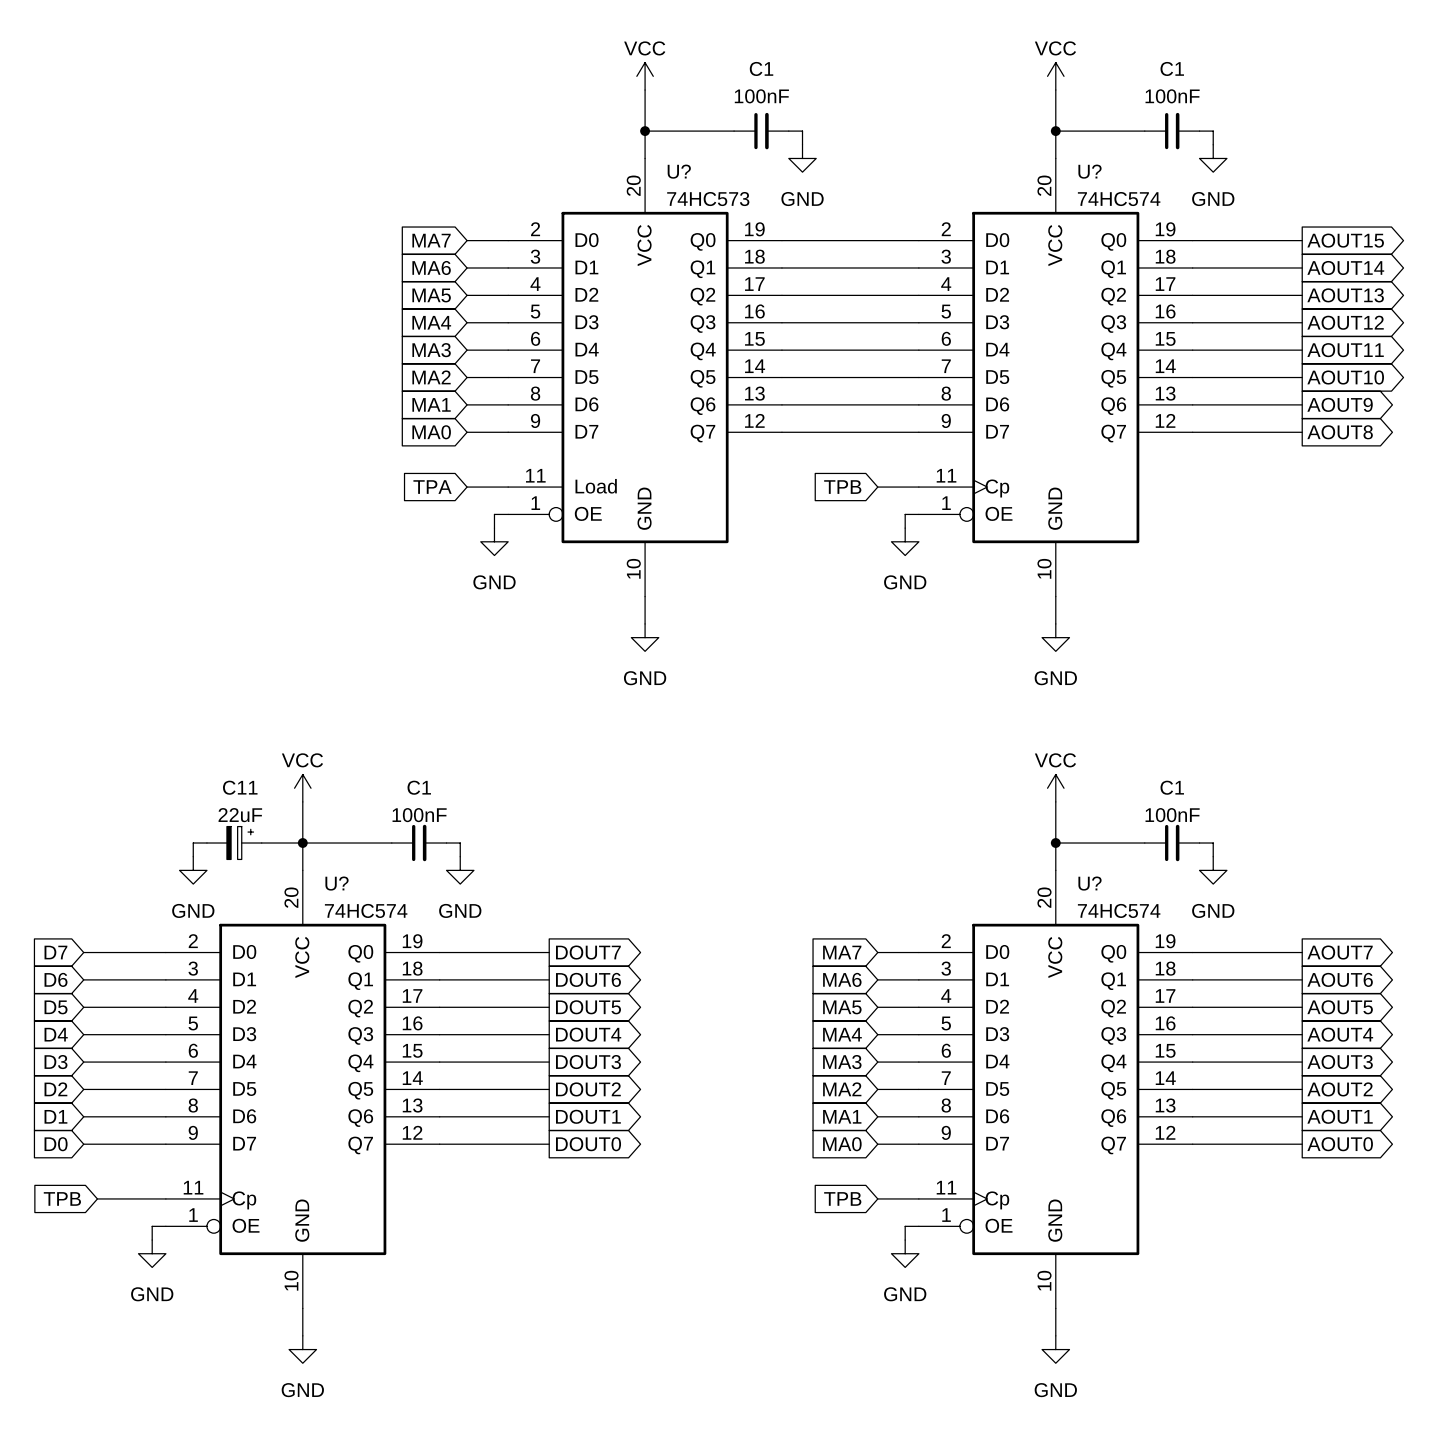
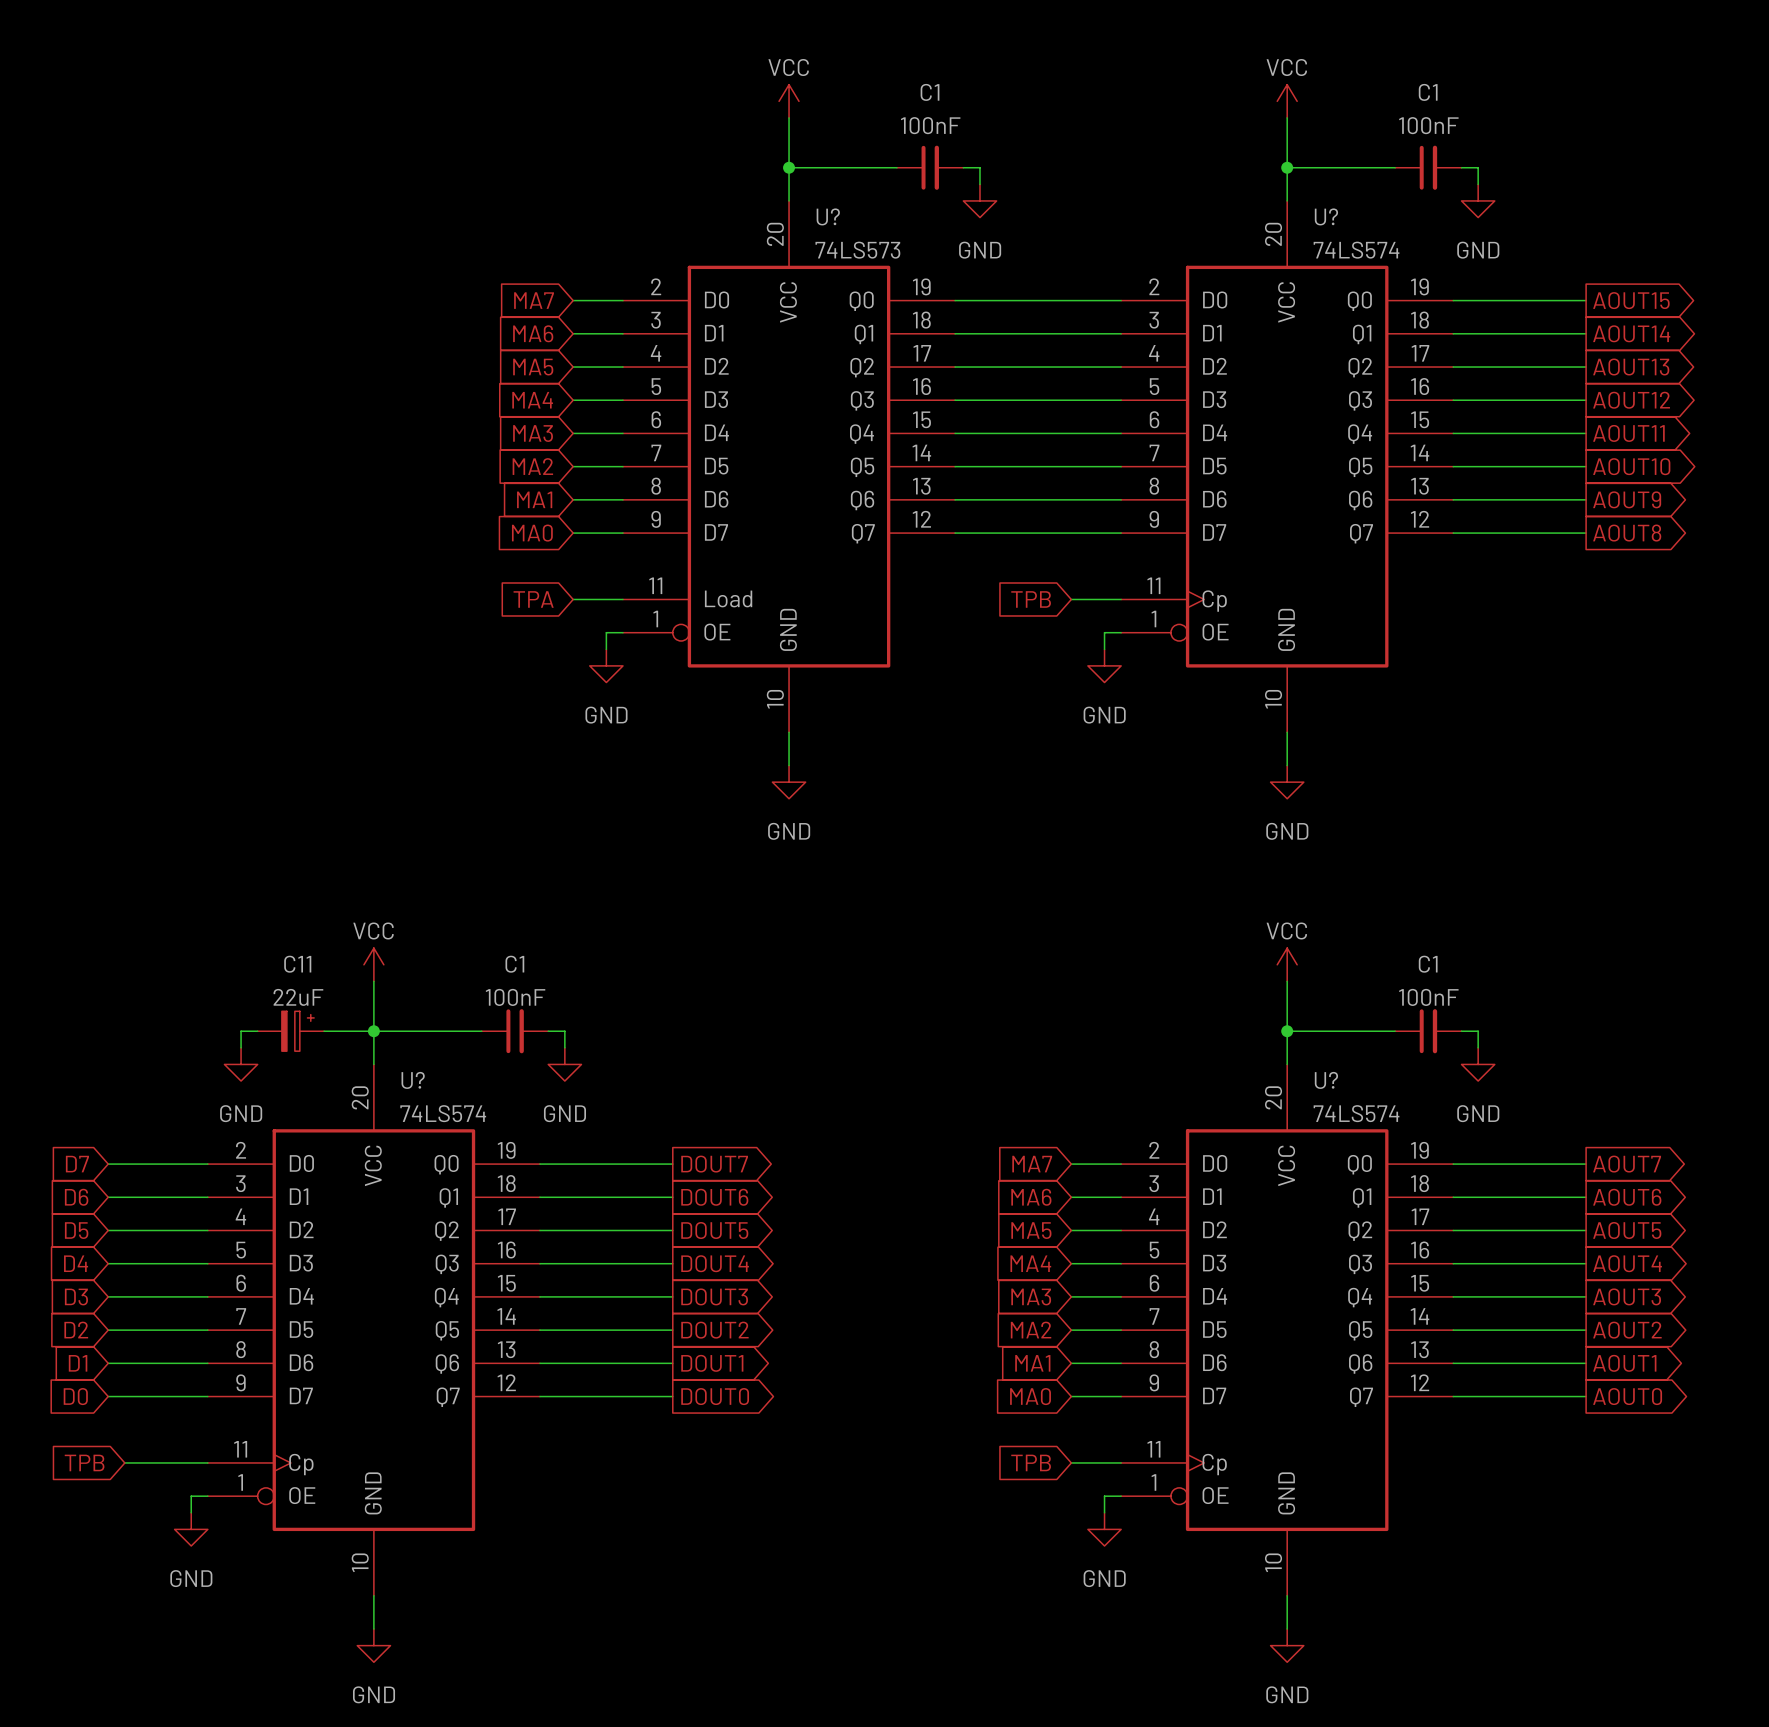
U? value: 74HC573 (708, 199) -> 74LS573 (857, 250)
U? value: 74HC574 (1119, 199) -> 74LS574 (1356, 250)
U? value: 74HC574 (366, 910) -> 74LS574 (443, 1113)
U? value: 74HC574 (1119, 910) -> 74LS574 (1356, 1113)

